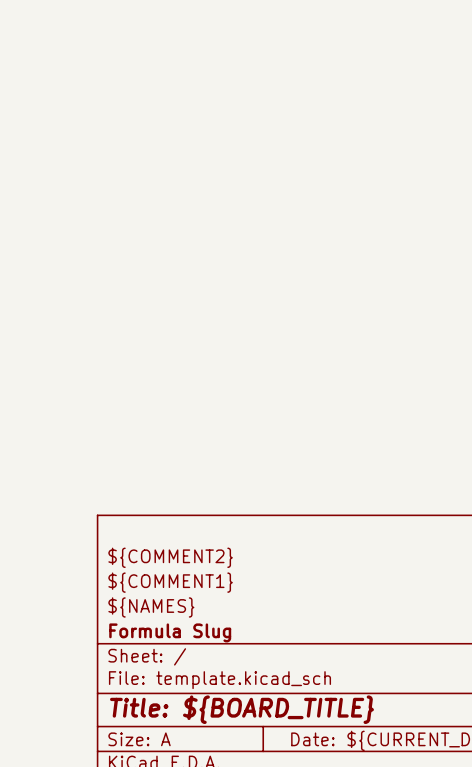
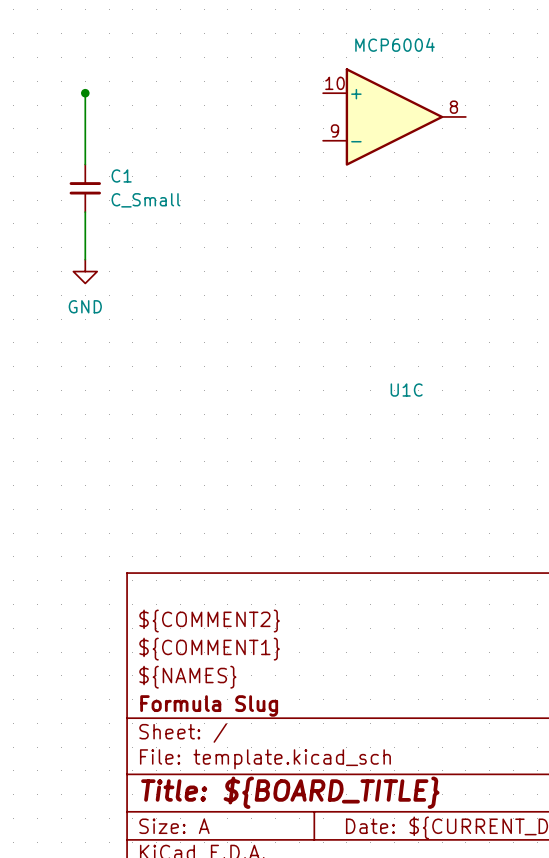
wire: none -> (85, 93) (85, 164)
junction: none -> (85, 93)
U1C: none -> MCP6004 (394, 116)
C1: none -> C_Small (85, 188)
wire: none -> (85, 212) (85, 259)
power symbol: none -> GND (85, 271)

